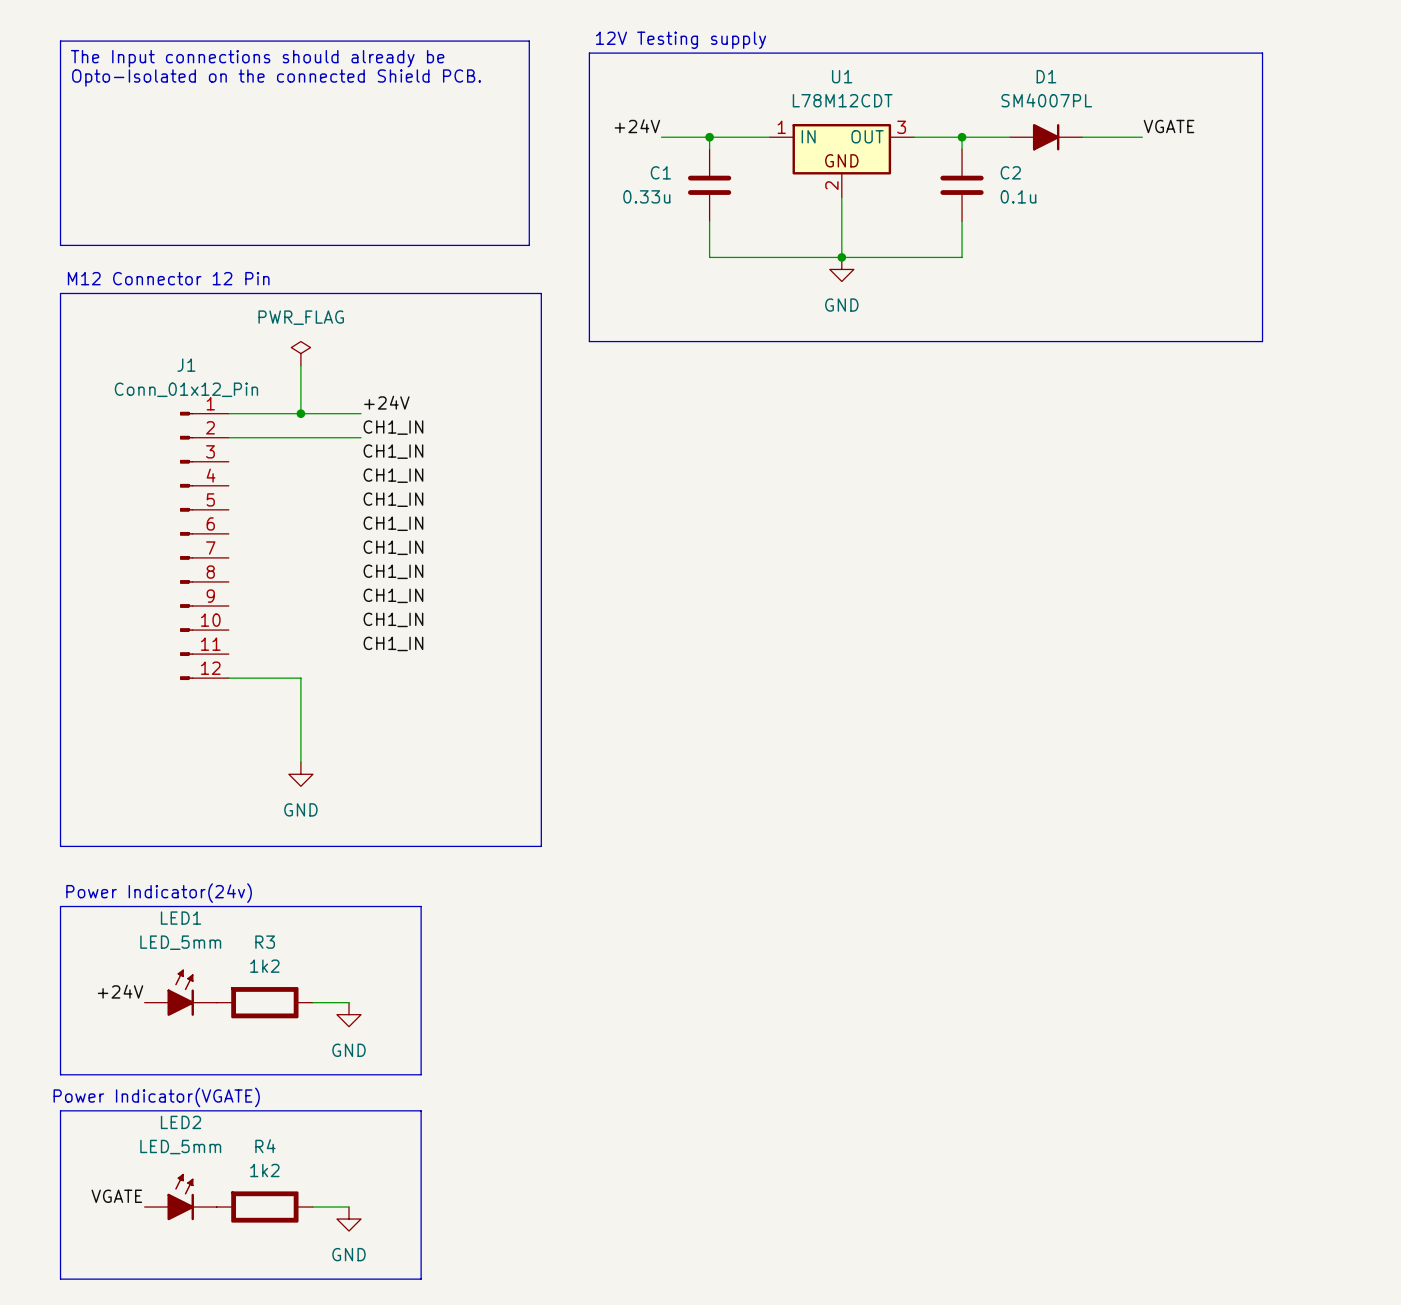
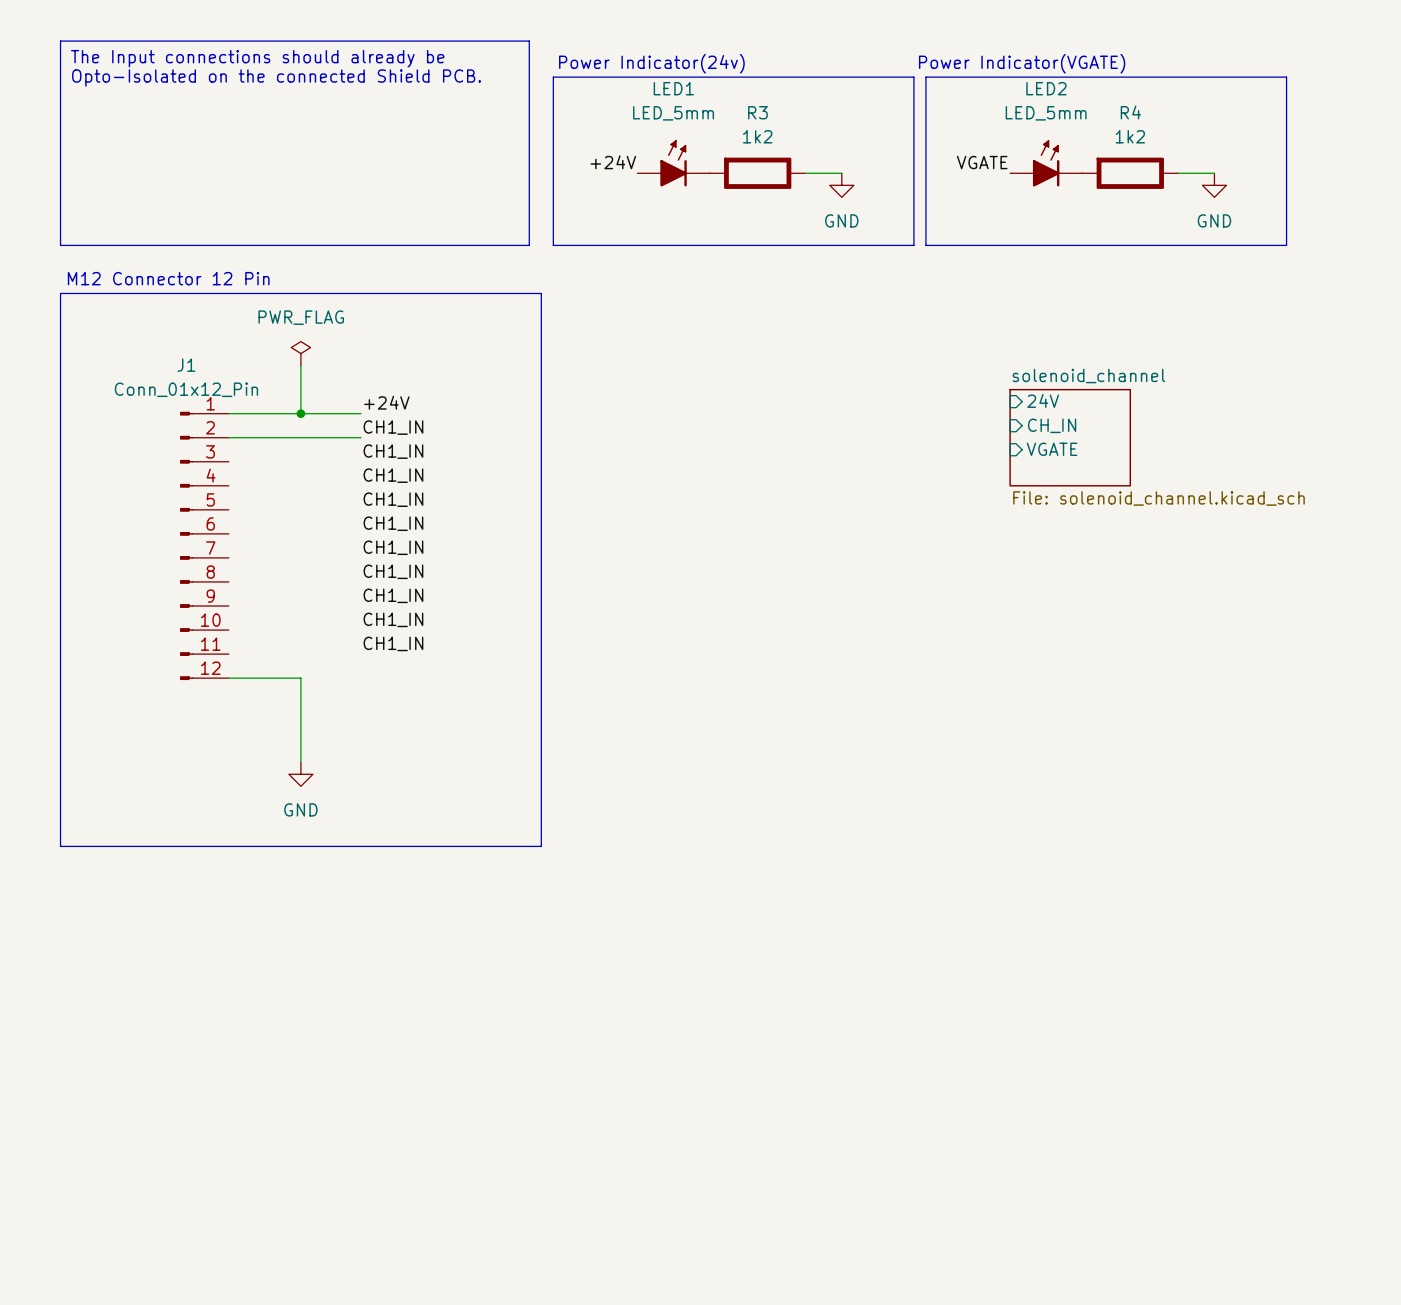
text: 12V Testing supply (681, 40) -> none
line: (589, 53) (1262, 53) (1262, 341) (589, 341) (589, 53) -> none
text: none -> Power Indicator(24v) (651, 63)
text: none -> Power Indicator(VGATE) (1022, 63)
line: none -> (553, 77) (913, 77) (913, 245) (553, 245) (553, 77)
line: none -> (925, 77) (1286, 77) (1286, 245) (925, 245) (925, 77)
label position: +24V (637, 126) -> +24V (613, 162)
label position: VGATE (1169, 126) -> VGATE (982, 162)
wire: (661, 137) (769, 137) -> none
wire: (709, 137) (709, 149) -> none
junction: (709, 137) -> none
wire: (913, 137) (1010, 137) -> none
wire: (962, 137) (962, 149) -> none
junction: (962, 137) -> none
D1: SM4007PL (1046, 137) -> none
wire: (1082, 137) (1142, 137) -> none
U1: L78M12CDT (841, 160) -> none
wire: none -> (1178, 173) (1214, 173)
C1: 0.33u (709, 185) -> none
C2: 0.1u (962, 185) -> none
power symbol: none -> GND (1214, 185)
wire: (841, 197) (841, 257) -> none
wire: (709, 221) (709, 257) (962, 257) (962, 221) -> none
junction: (841, 257) -> none
power symbol position: GND (841, 269) -> GND (841, 185)
sheet pin: none -> 24V (1043, 400)
sheet pin: none -> CH_IN (1052, 425)
sheet solenoid_channel: none -> File: solenoid_channel.kicad_sch (1070, 437)
sheet pin: none -> VGATE (1052, 449)
text: Power Indicator(24v) (159, 893) -> none
line: (60, 906) (60, 1074) (421, 1074) (421, 906) (60, 906) -> none
label: +24V (120, 991) -> none
LED1 position: (180, 992) -> (673, 163)
R3 position: (264, 1002) -> (757, 173)
wire: (312, 1002) (349, 1002) -> none
power symbol: GND (349, 1014) -> none
text: Power Indicator(VGATE) (156, 1097) -> none
line: (60, 1110) (421, 1110) (421, 1279) (60, 1279) (60, 1110) -> none
label: VGATE (116, 1196) -> none
LED2 position: (180, 1197) -> (1046, 163)
R4 position: (264, 1207) -> (1130, 173)
wire: (312, 1207) (349, 1207) -> none
power symbol: GND (349, 1219) -> none

